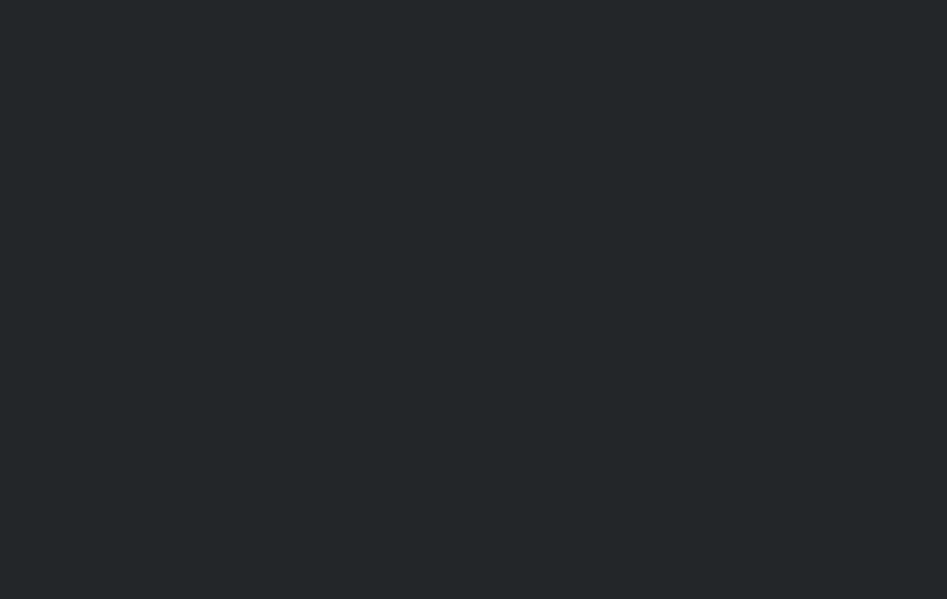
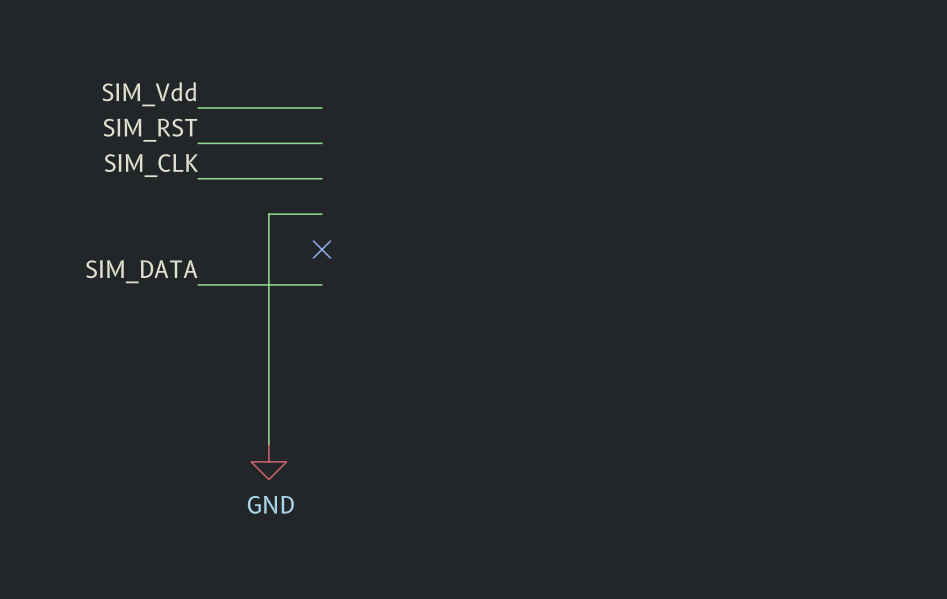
label: none -> SIM_Vdd (149, 94)
wire: none -> (198, 107) (321, 107)
label: none -> SIM_RST (150, 130)
wire: none -> (198, 143) (321, 143)
label: none -> SIM_CLK (151, 165)
wire: none -> (198, 178) (321, 178)
wire: none -> (321, 214) (268, 214) (268, 444)
no-connect mark: none -> (321, 249)
label: none -> SIM_DATA (141, 271)
wire: none -> (198, 284) (321, 284)
power symbol: none -> GND (268, 461)

